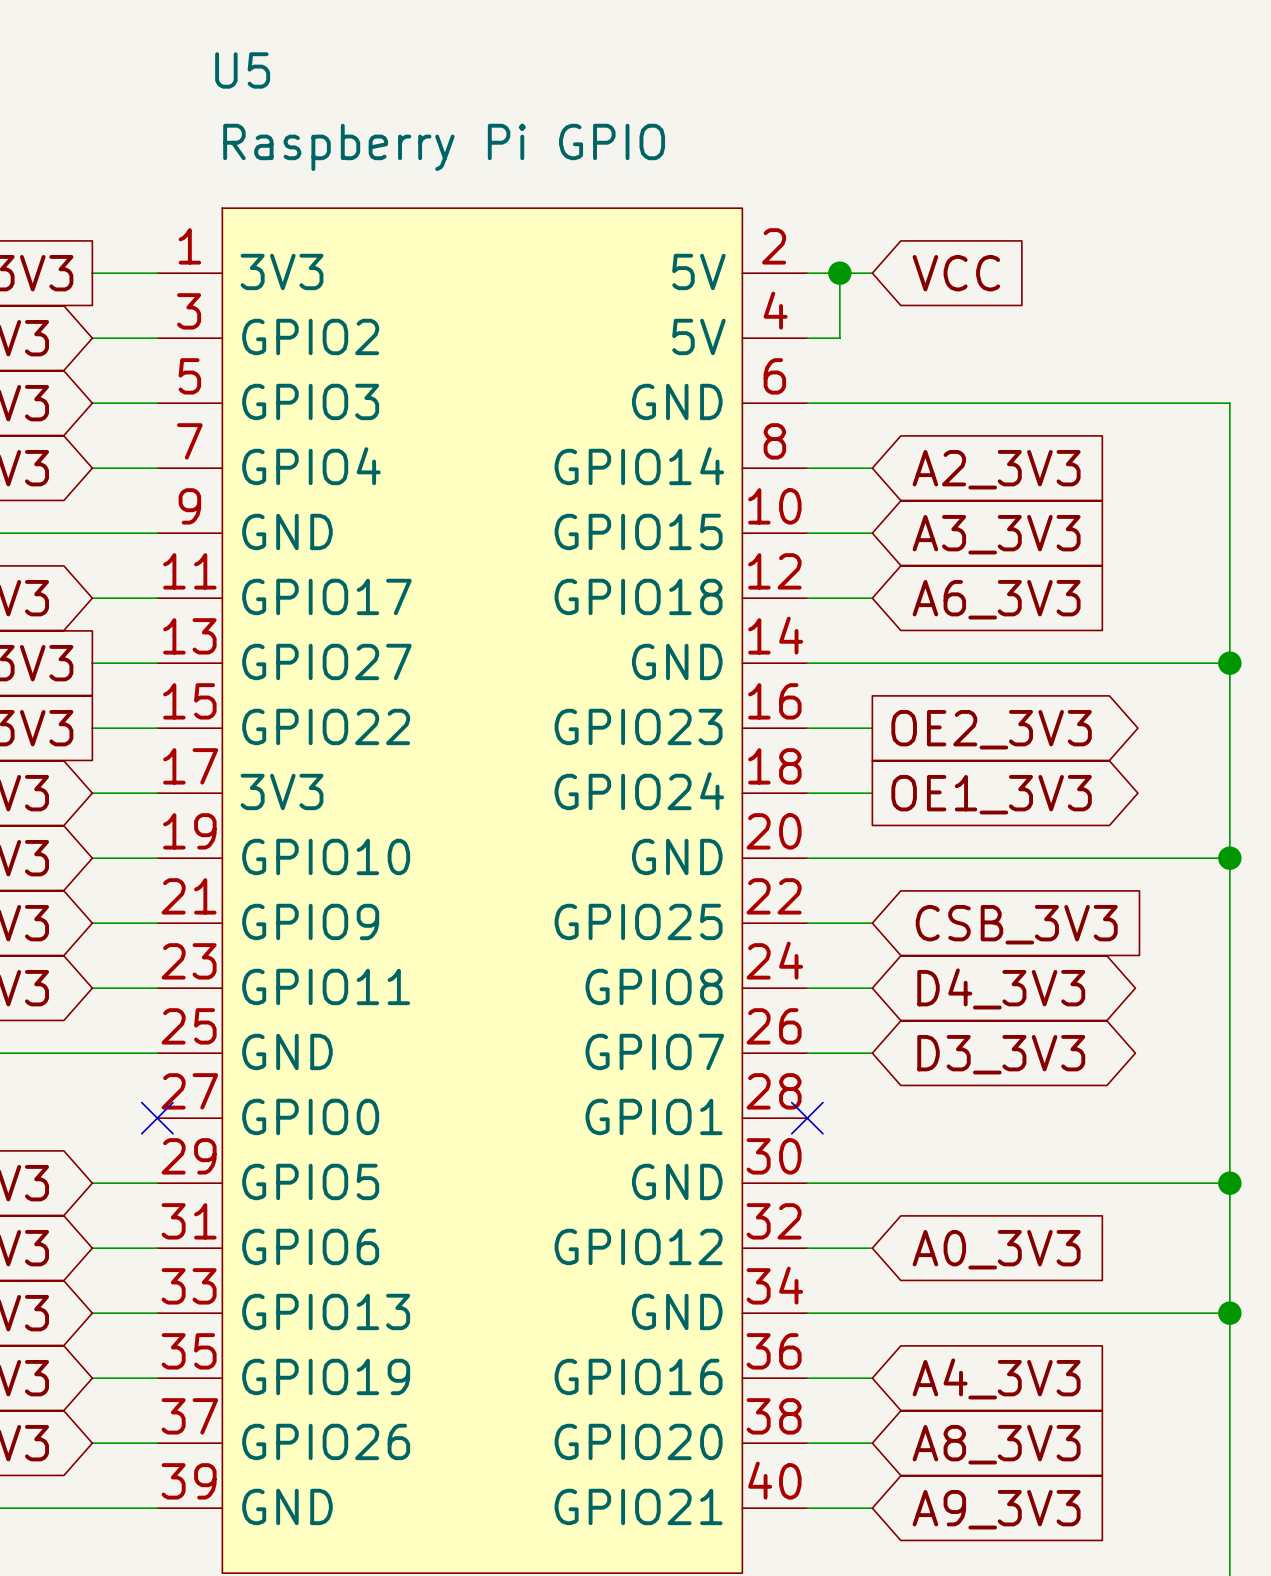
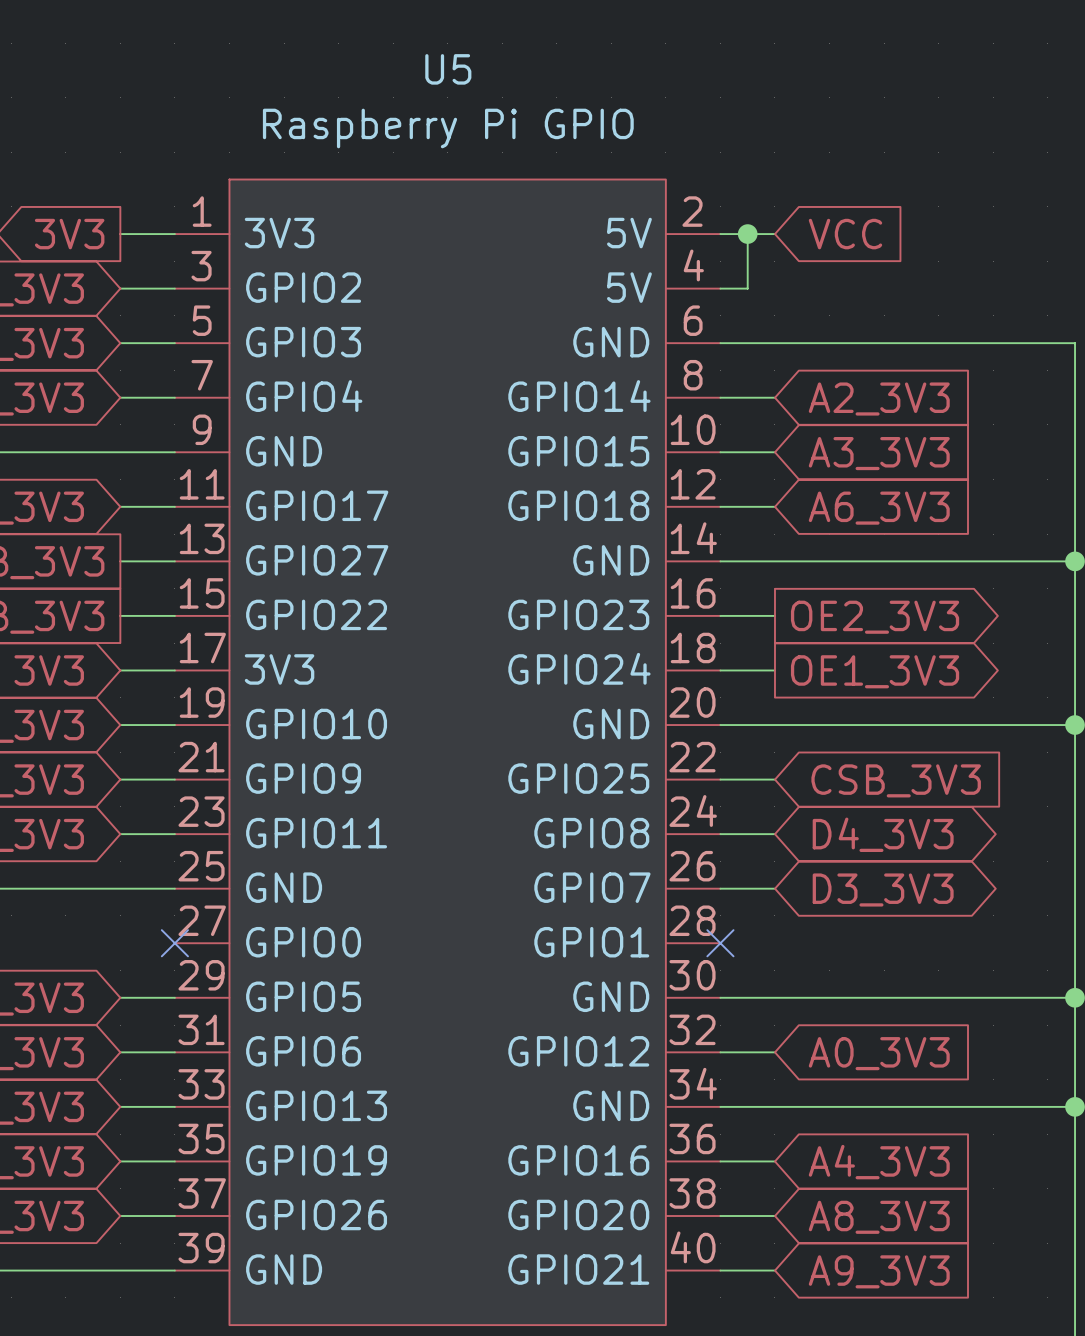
U5 name position: U5 (242, 70) -> U5 (448, 69)
U5 value position: Raspberry Pi GPIO (444, 147) -> Raspberry Pi GPIO (448, 128)

